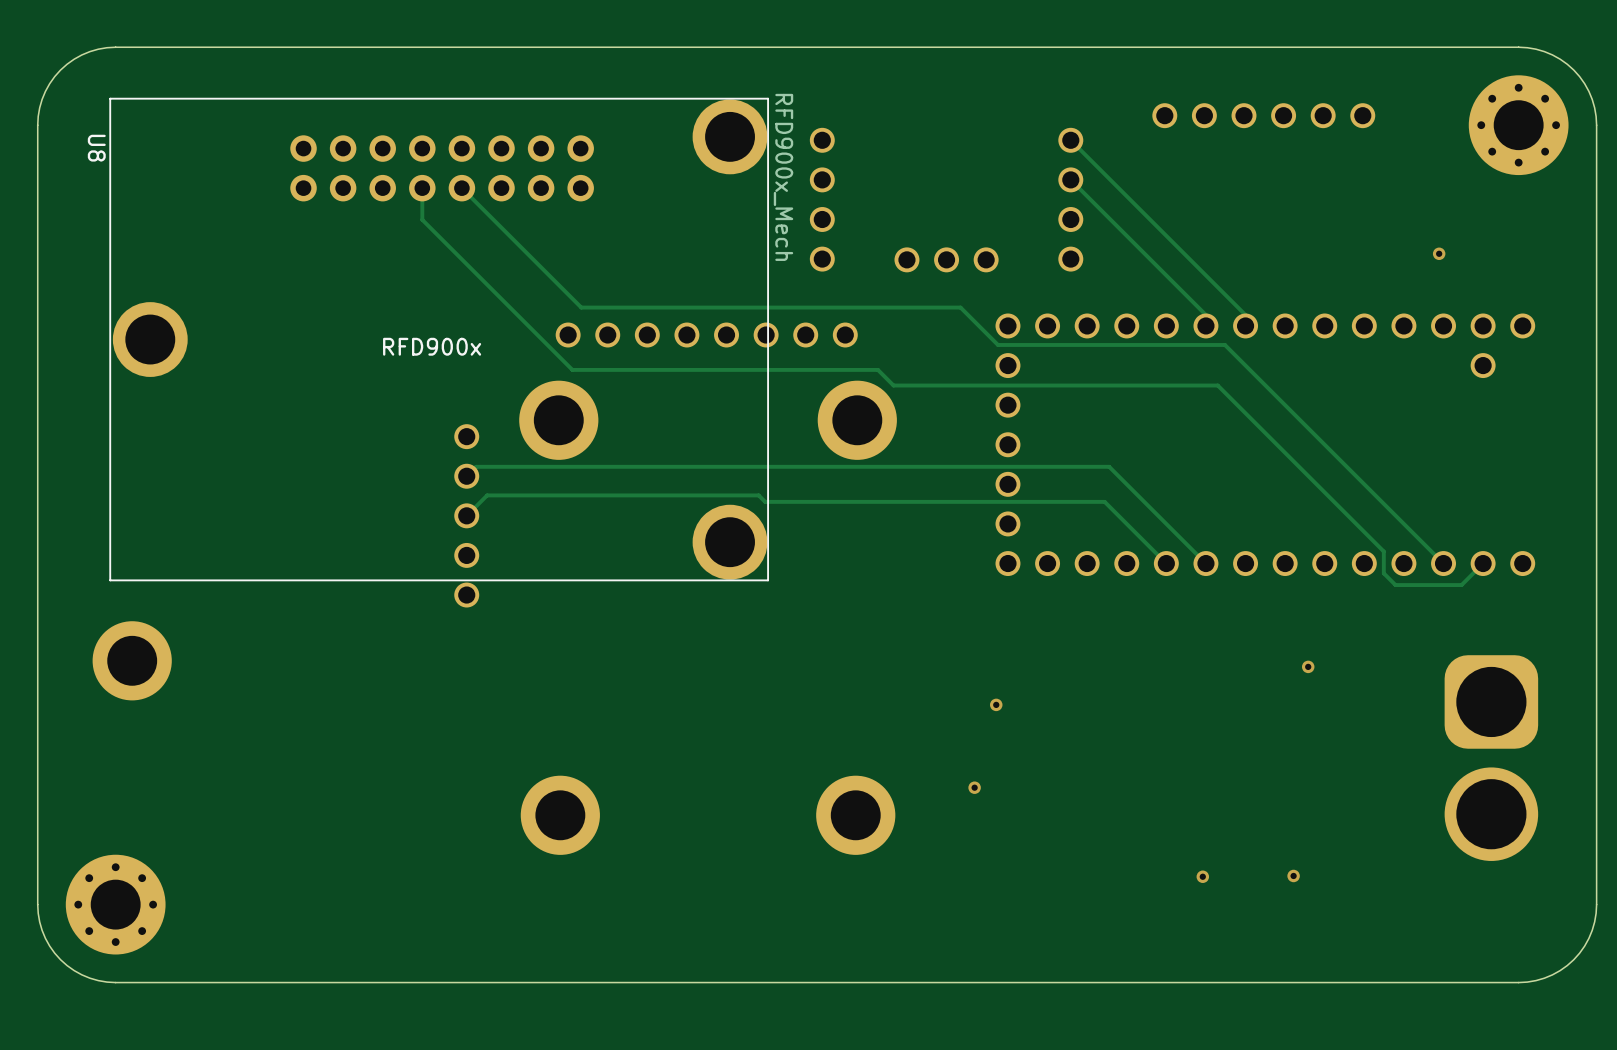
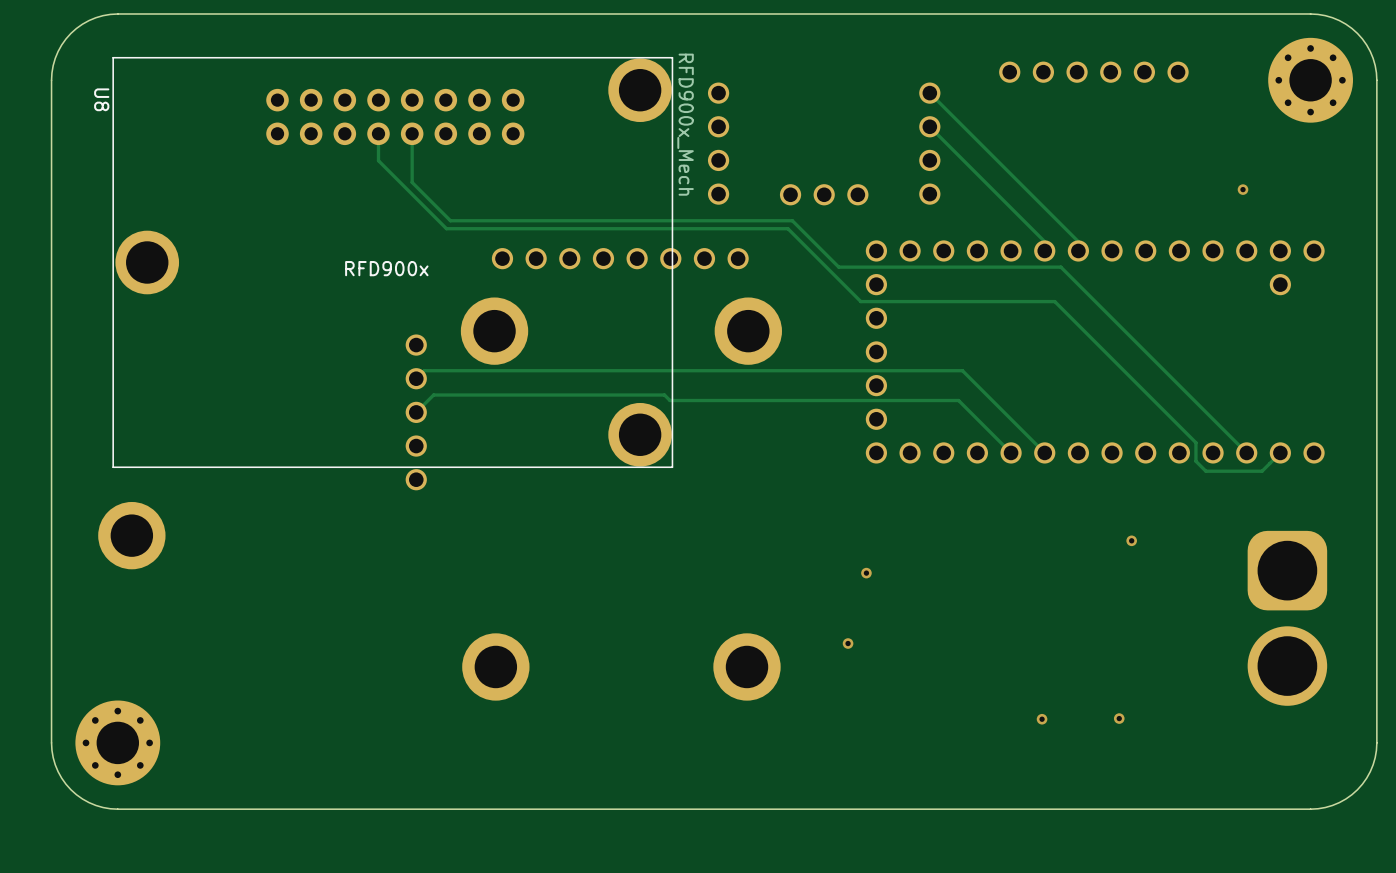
track: (461, 188) (581, 307) (960, 307) (998, 344) -> (412, 133) (412, 182) (450, 220) (792, 220) (838, 267) (867, 267)
track: (502, 299) (572, 369) (877, 369) (893, 385) (989, 385) -> (446, 228) (787, 228) (860, 301)

